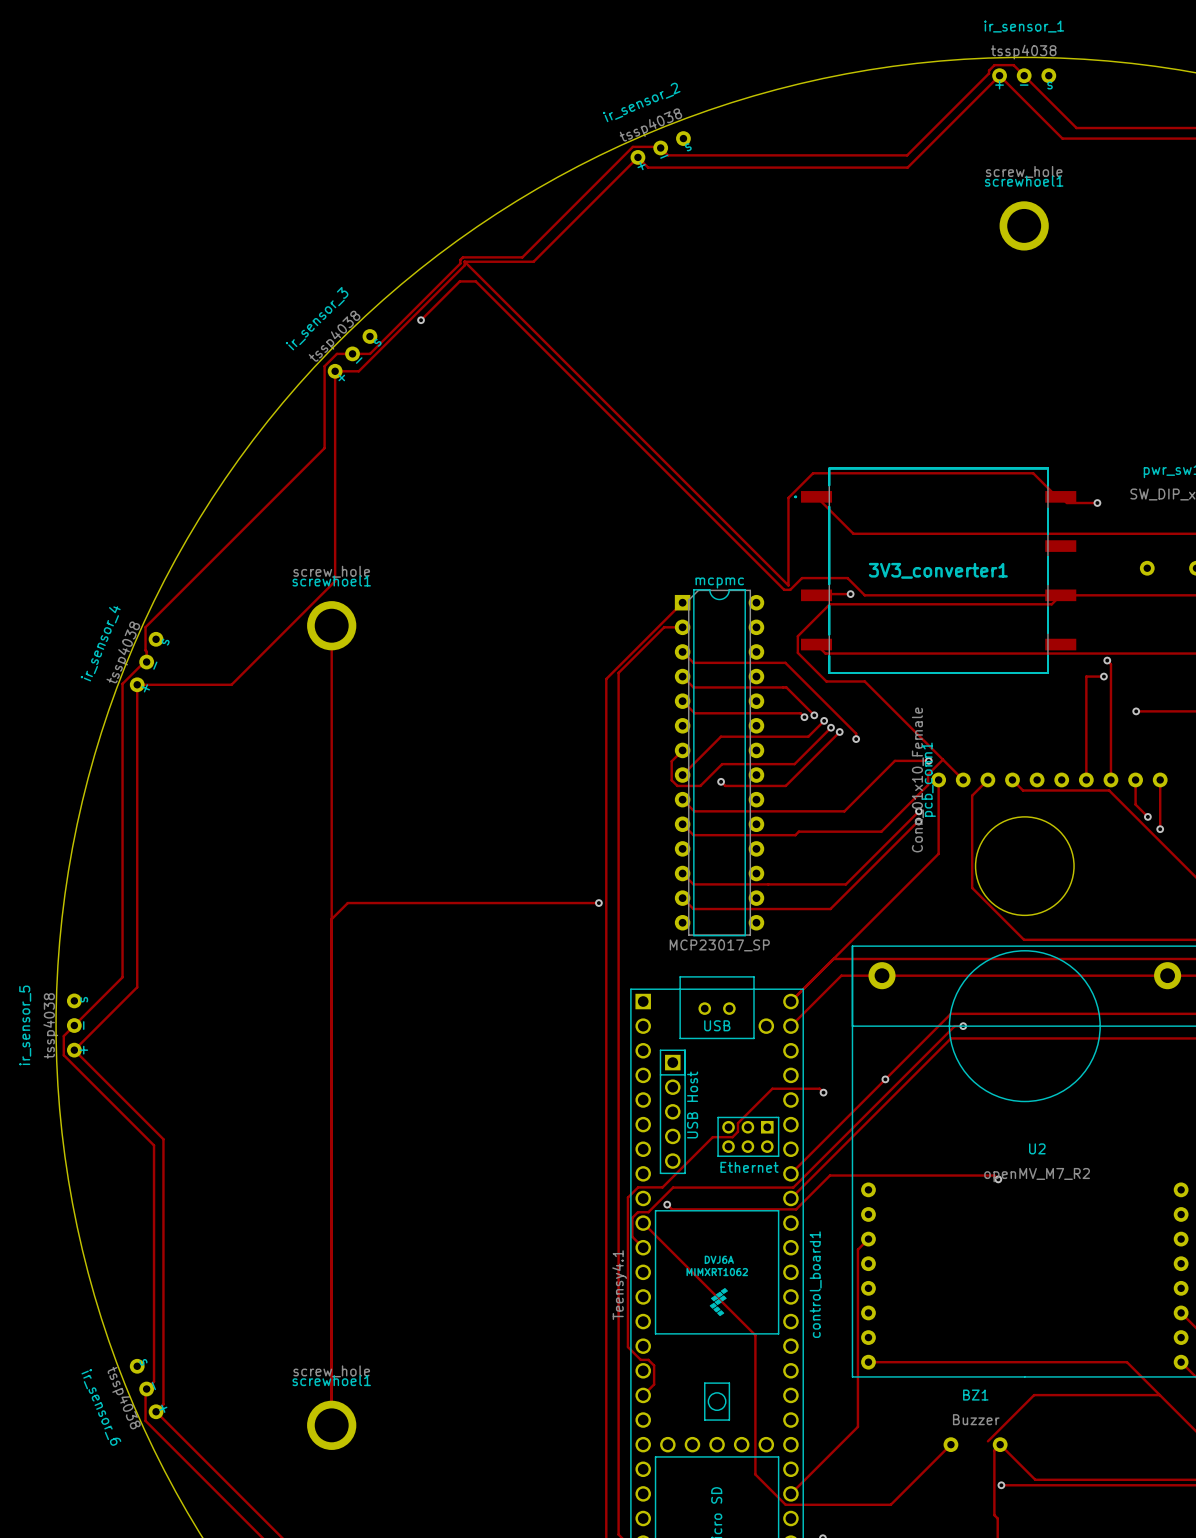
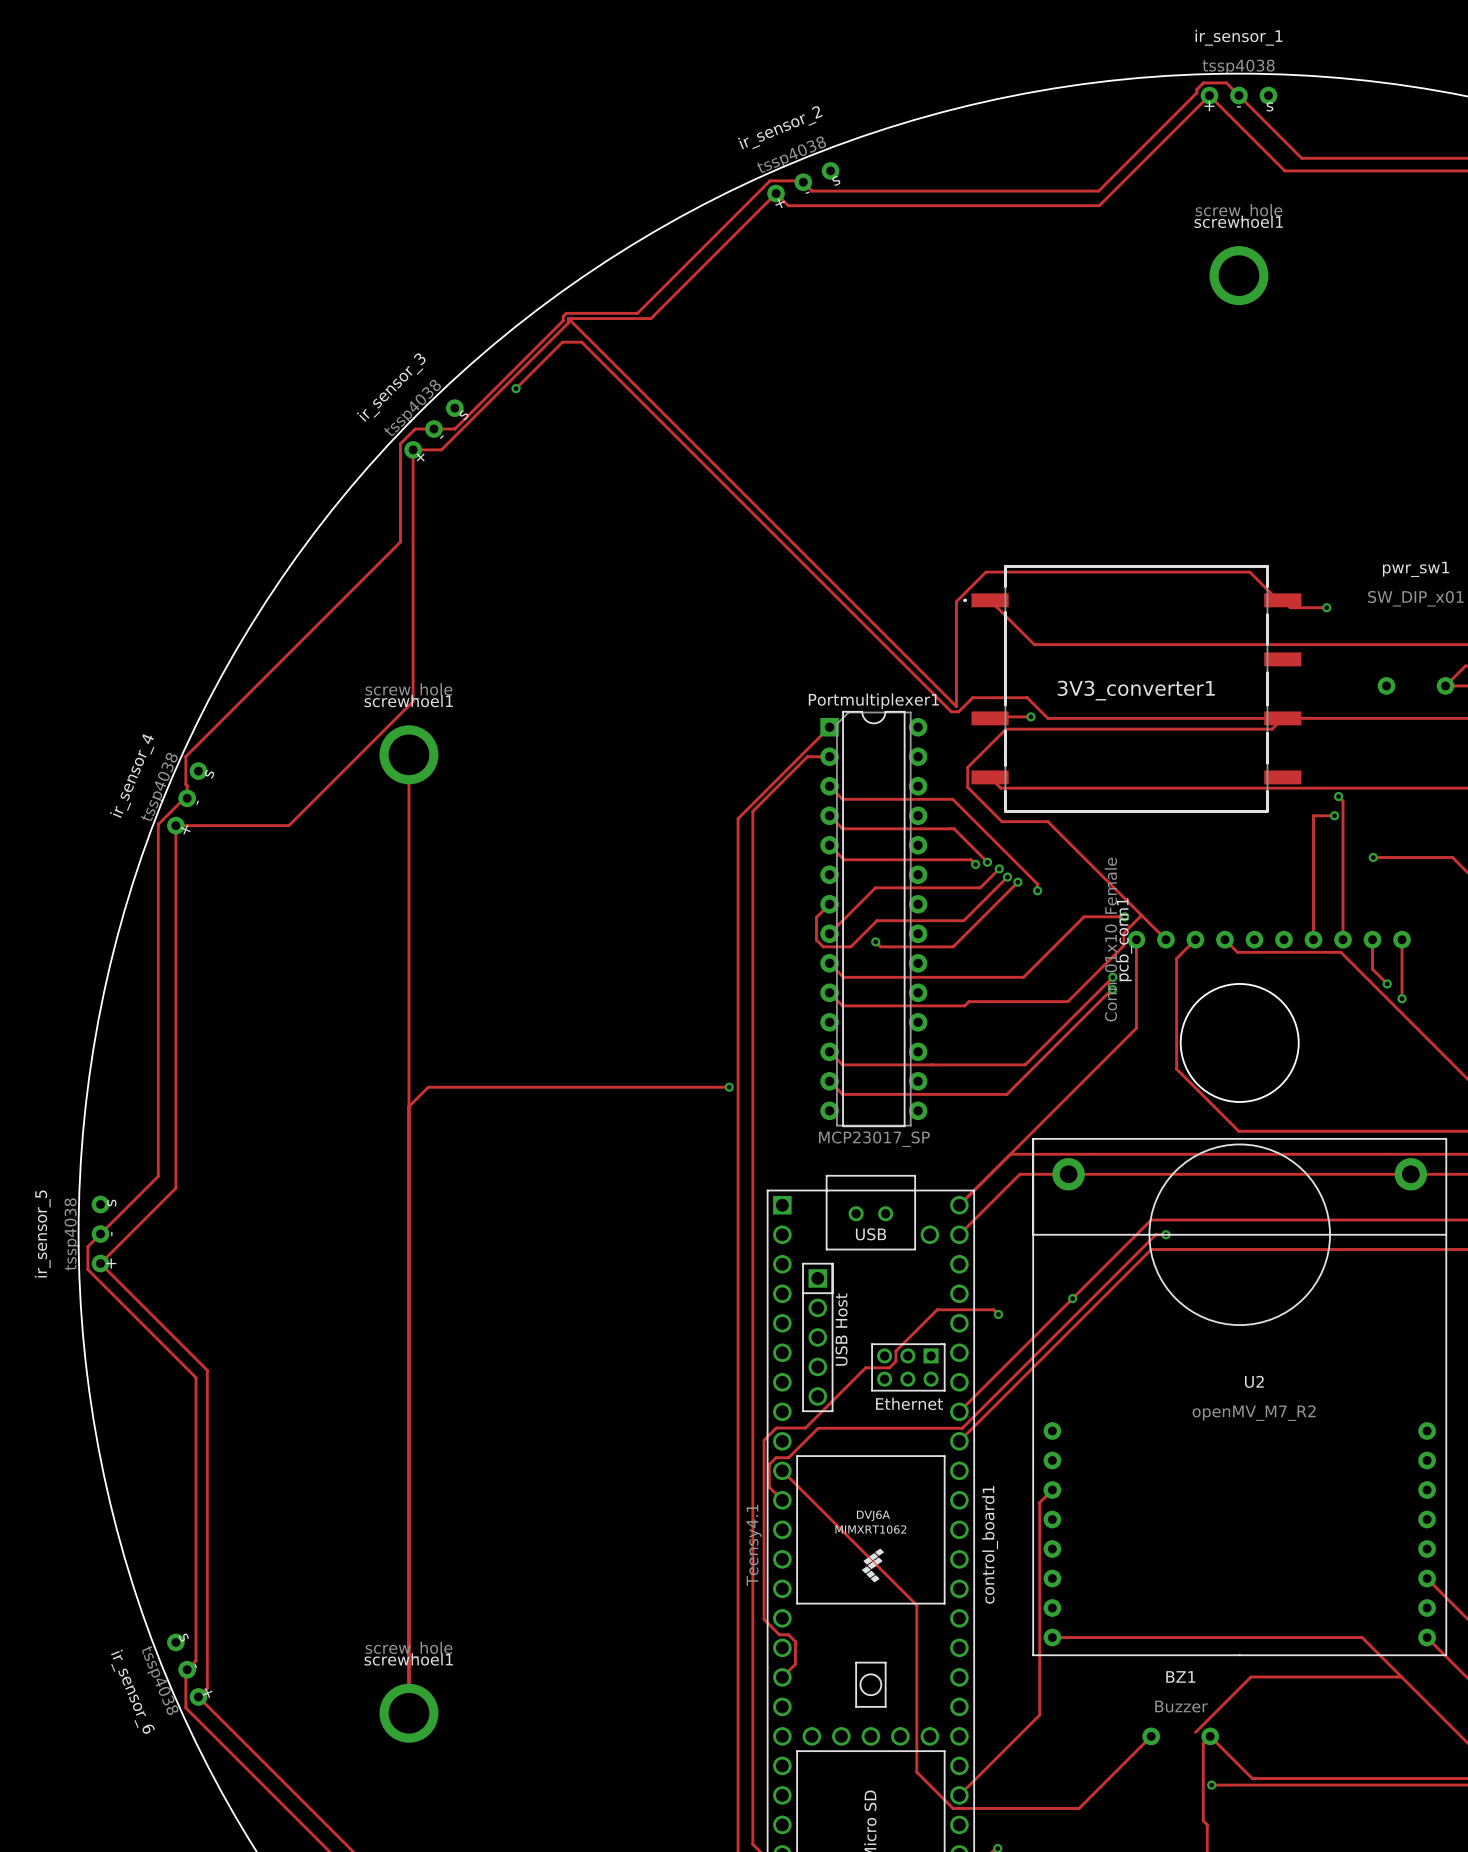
mcpmc name: mcpmc (719, 582) -> Portmultiplexer1 (873, 701)
track: (998, 1179) (994, 1175) (830, 1175) (796, 1209) (671, 1209) (667, 1204) -> none
via: (998, 1179) -> none
via: (667, 1204) -> none

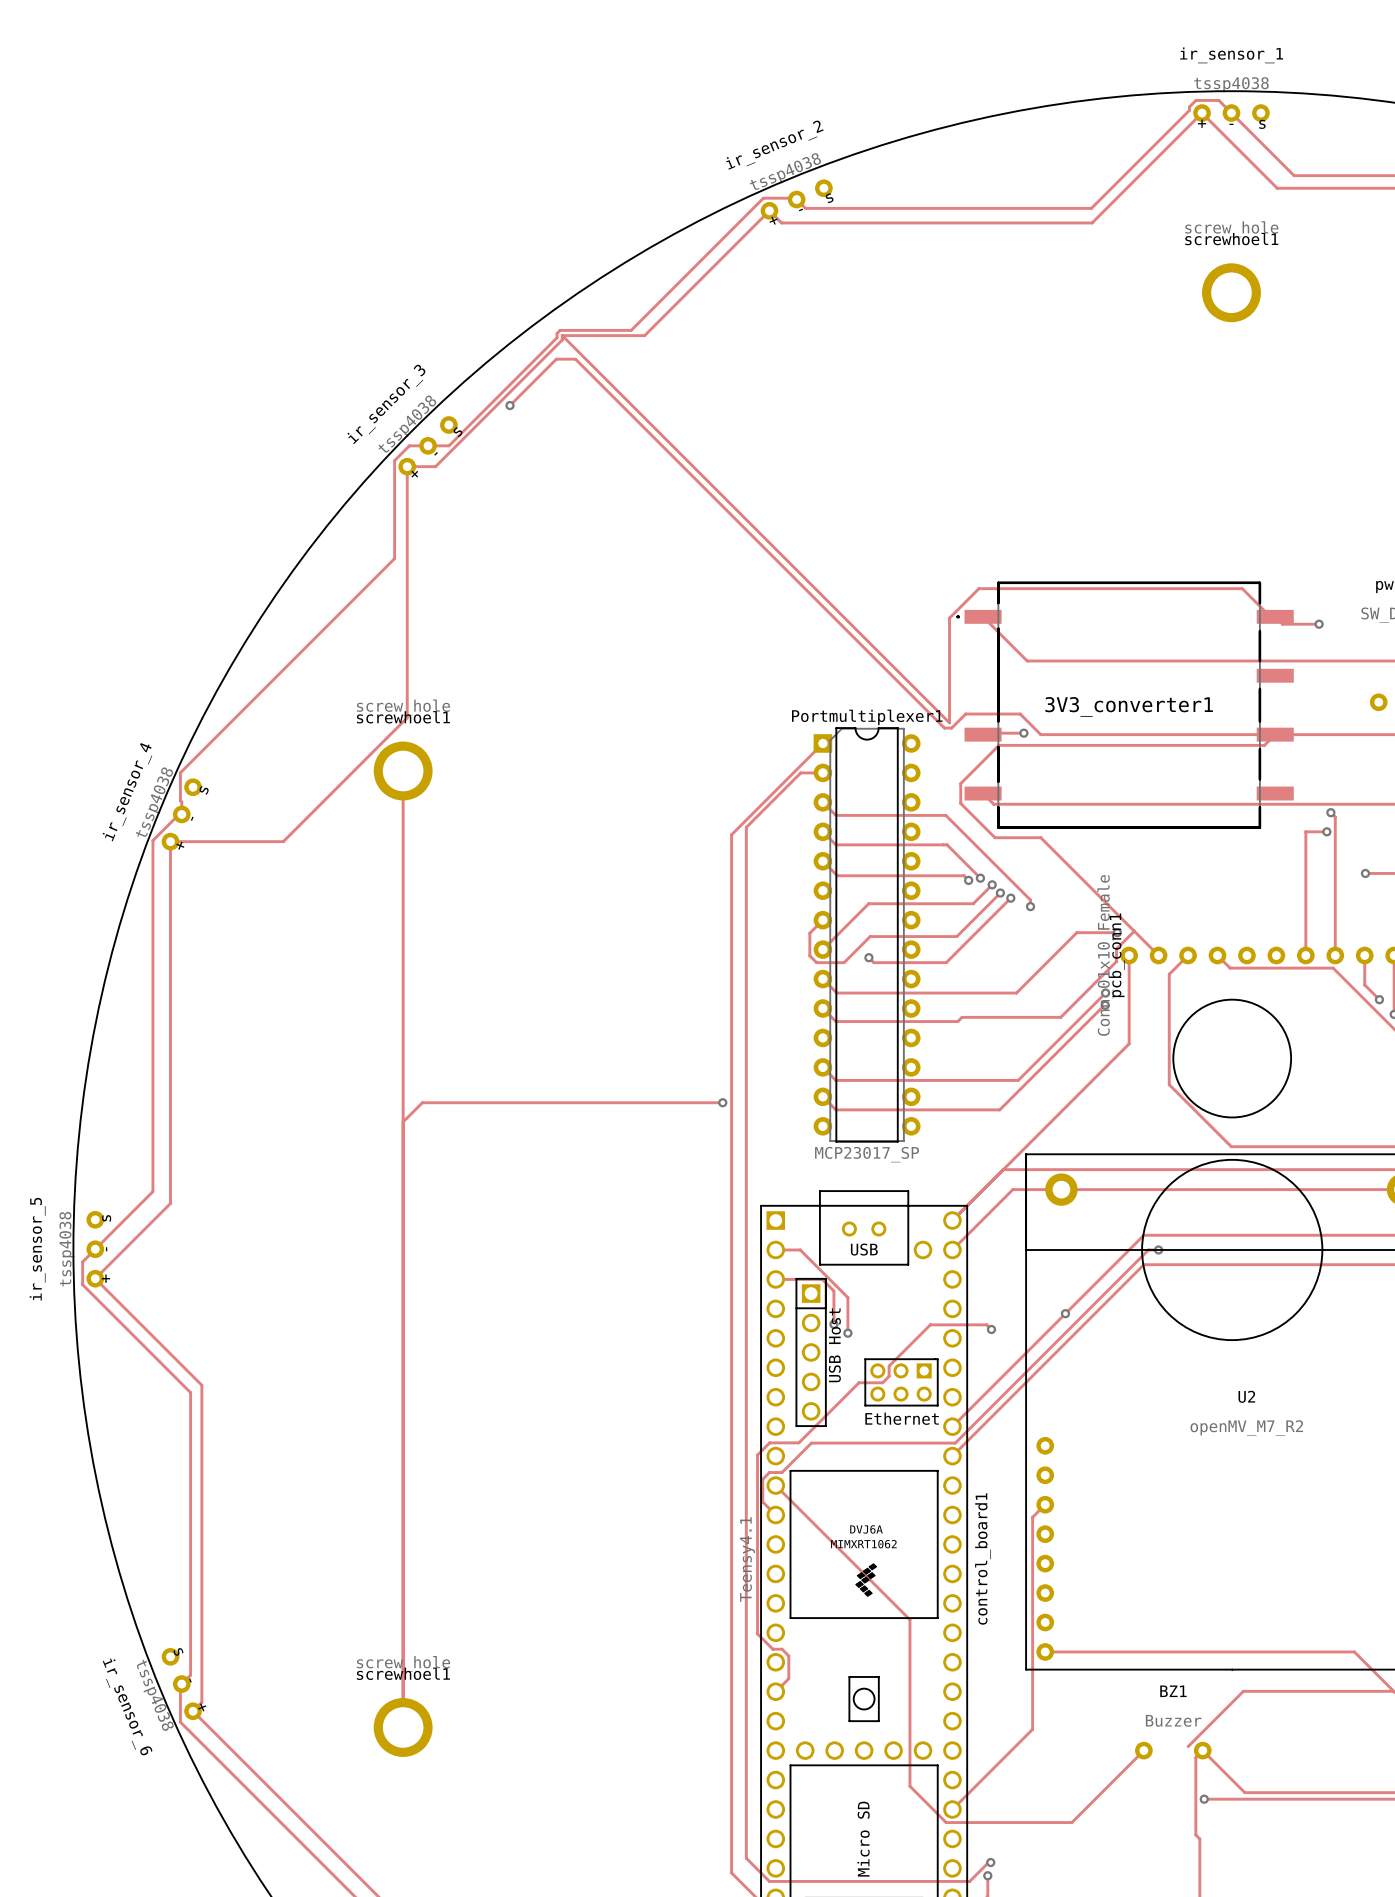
track: none -> (775, 1249) (800, 1249) (847, 1297) (847, 1333)
track: none -> (775, 1279) (822, 1279) (833, 1291) (833, 1324)
via: none -> (833, 1324)
via: none -> (847, 1333)

